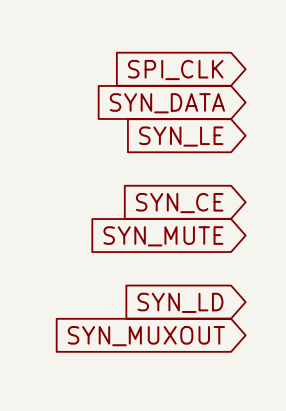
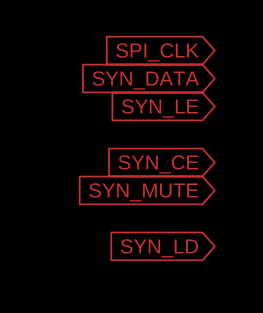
global label: SYN_MUXOUT (146, 336) -> none

